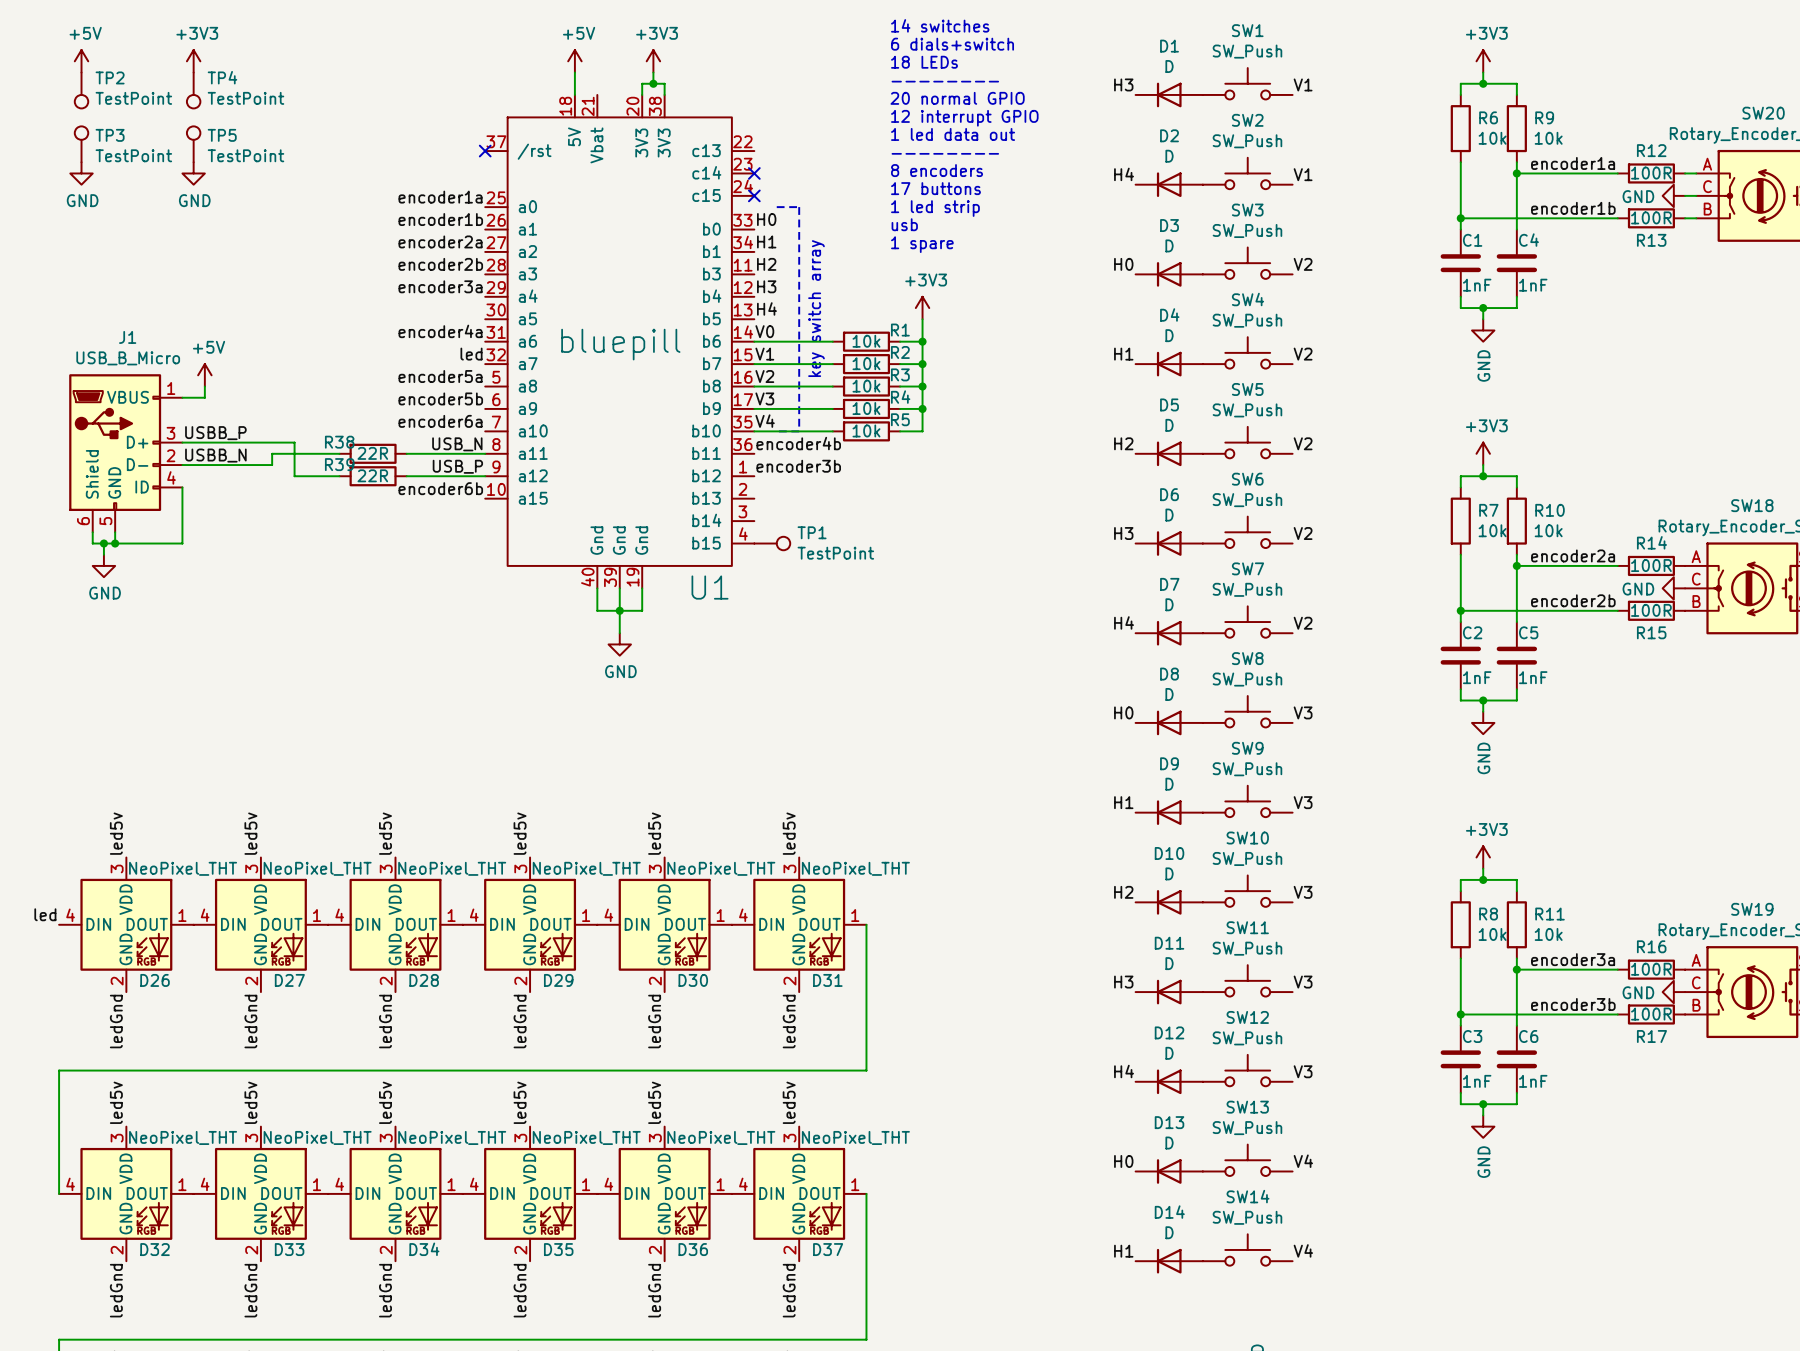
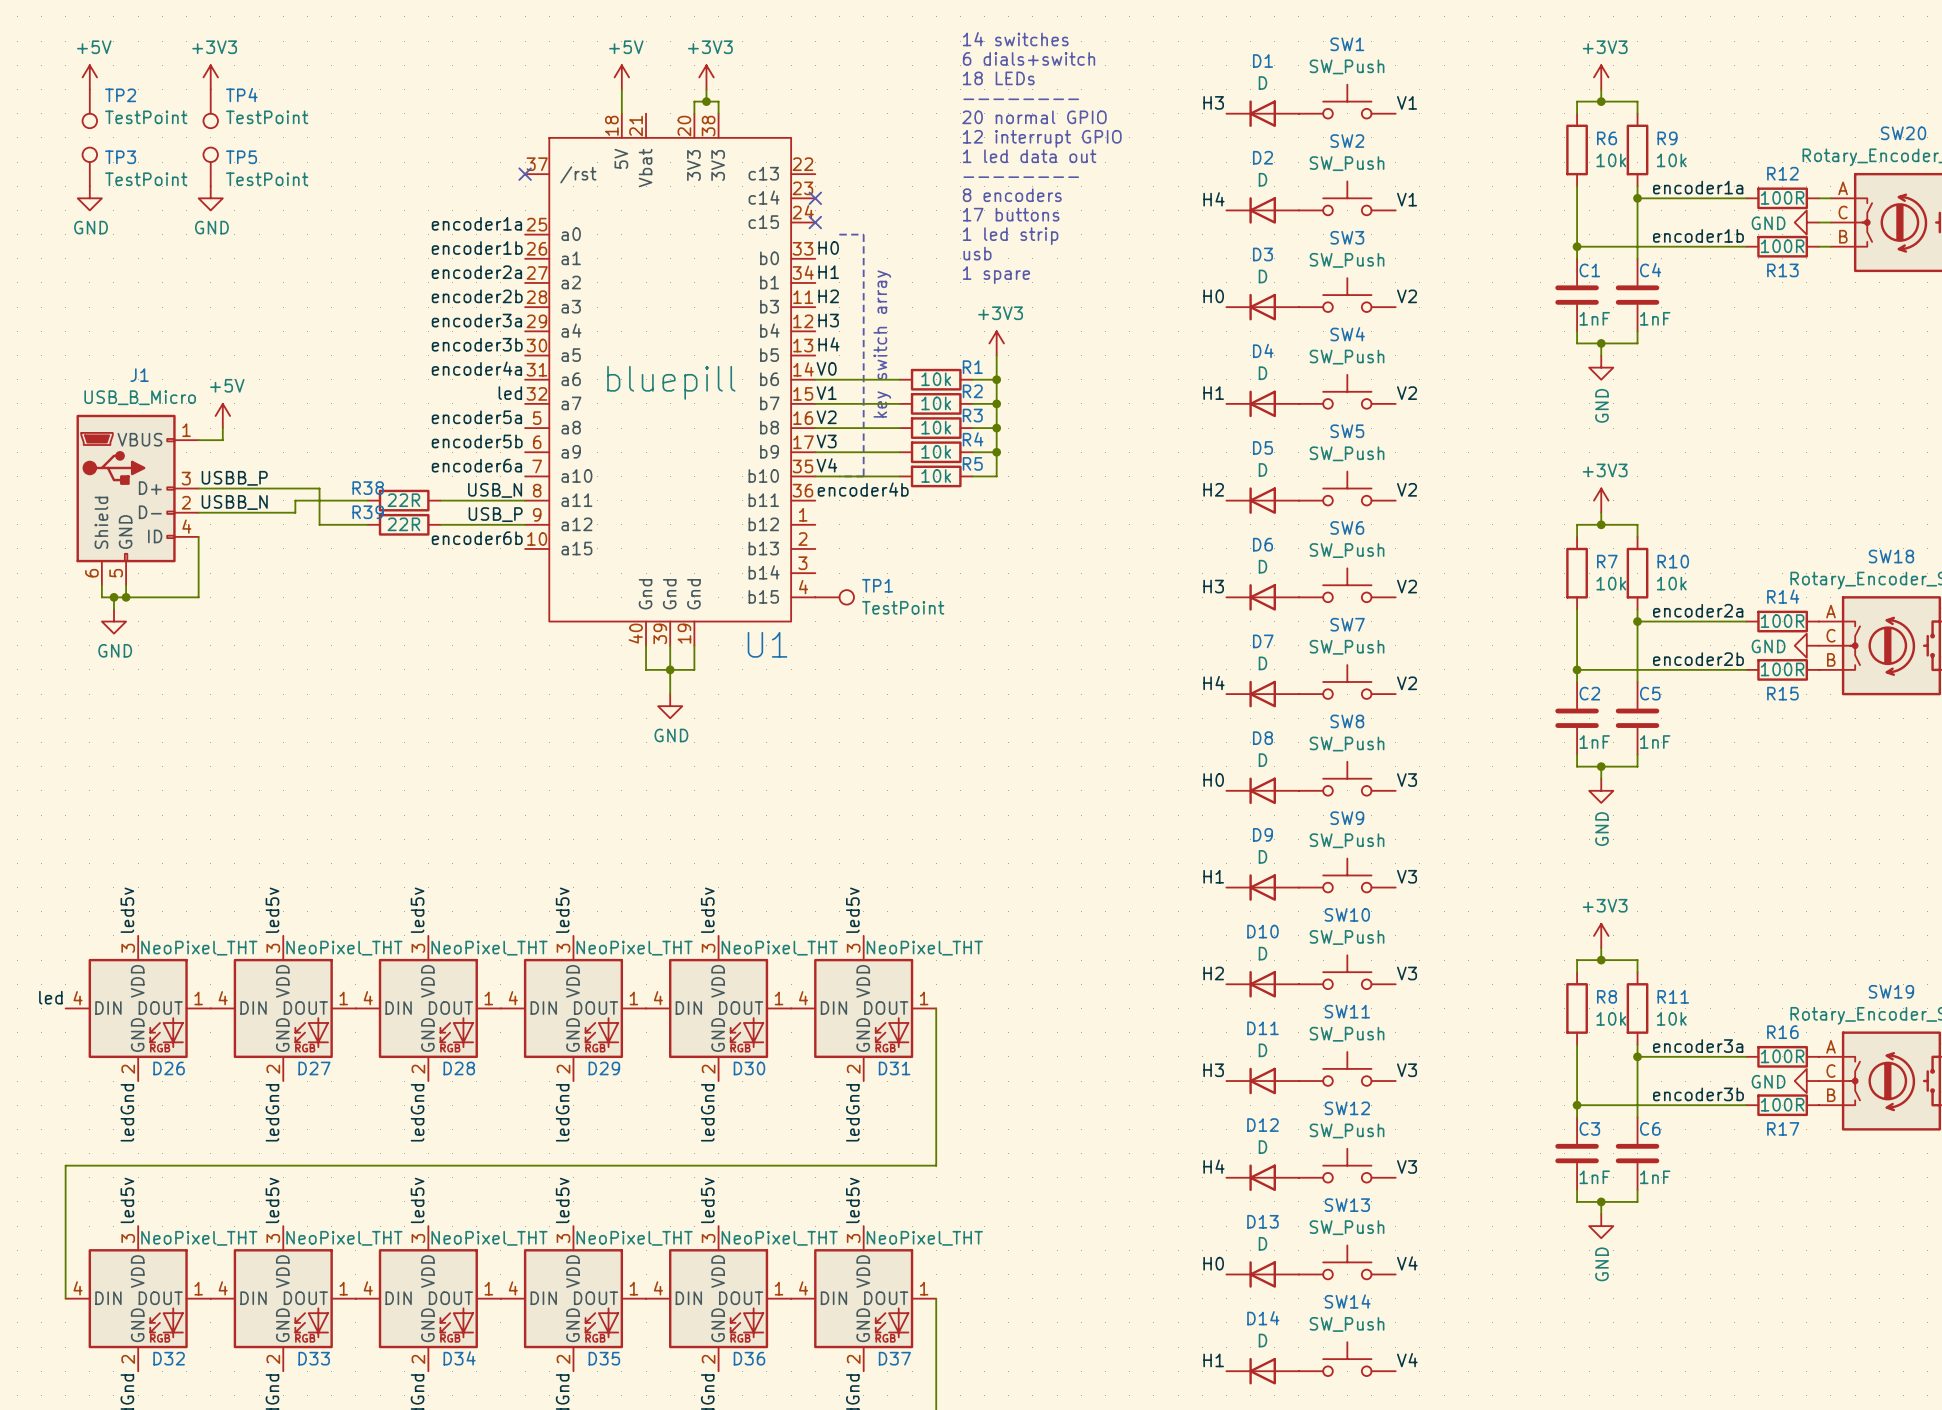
label: none -> encoder3b (477, 344)
label: encoder3b (798, 466) -> none

